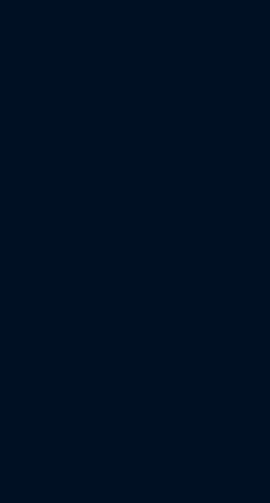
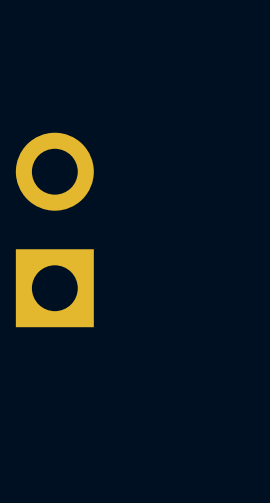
part: none -> (54, 229)

